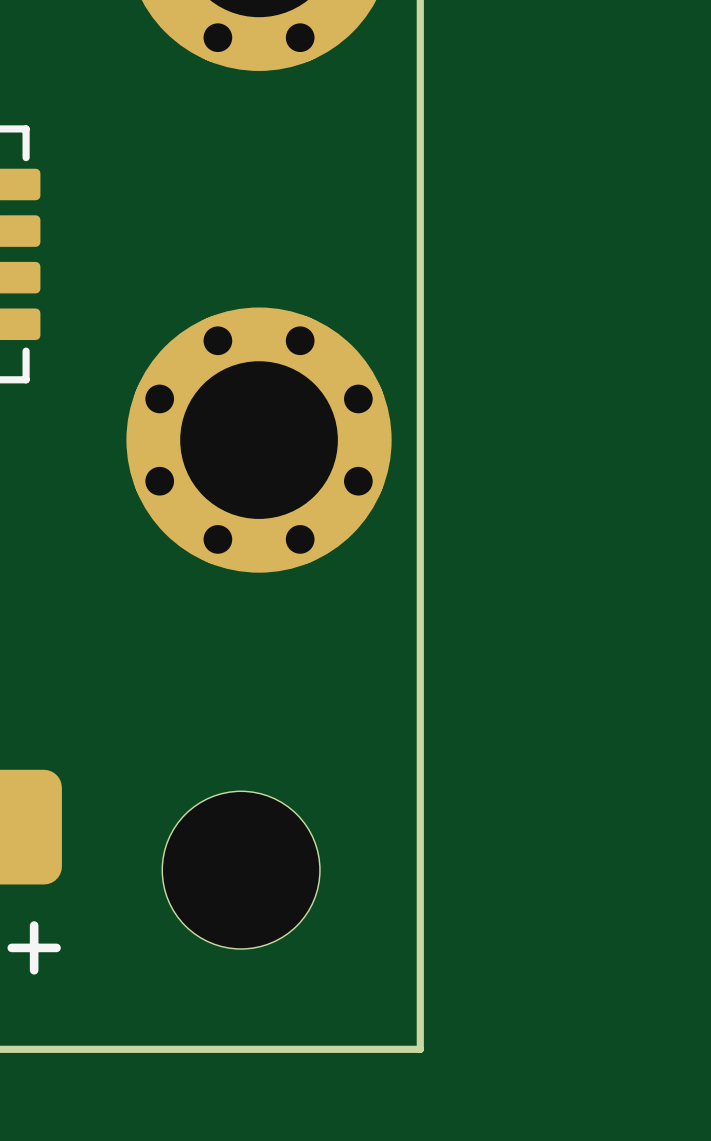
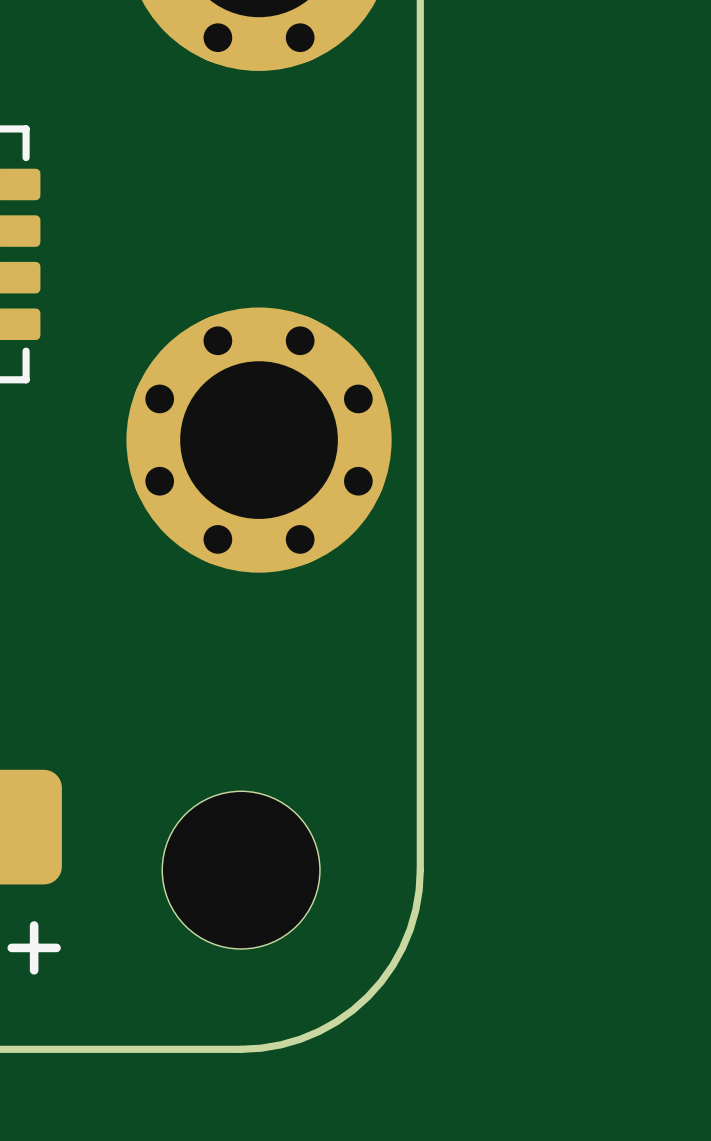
board edge: (420, 870) (420, 1049) (241, 1049) -> (420, 870) (415, 910) (402, 947) (392, 965) (367, 996) (352, 1010) (318, 1031) (280, 1044) (241, 1049)

